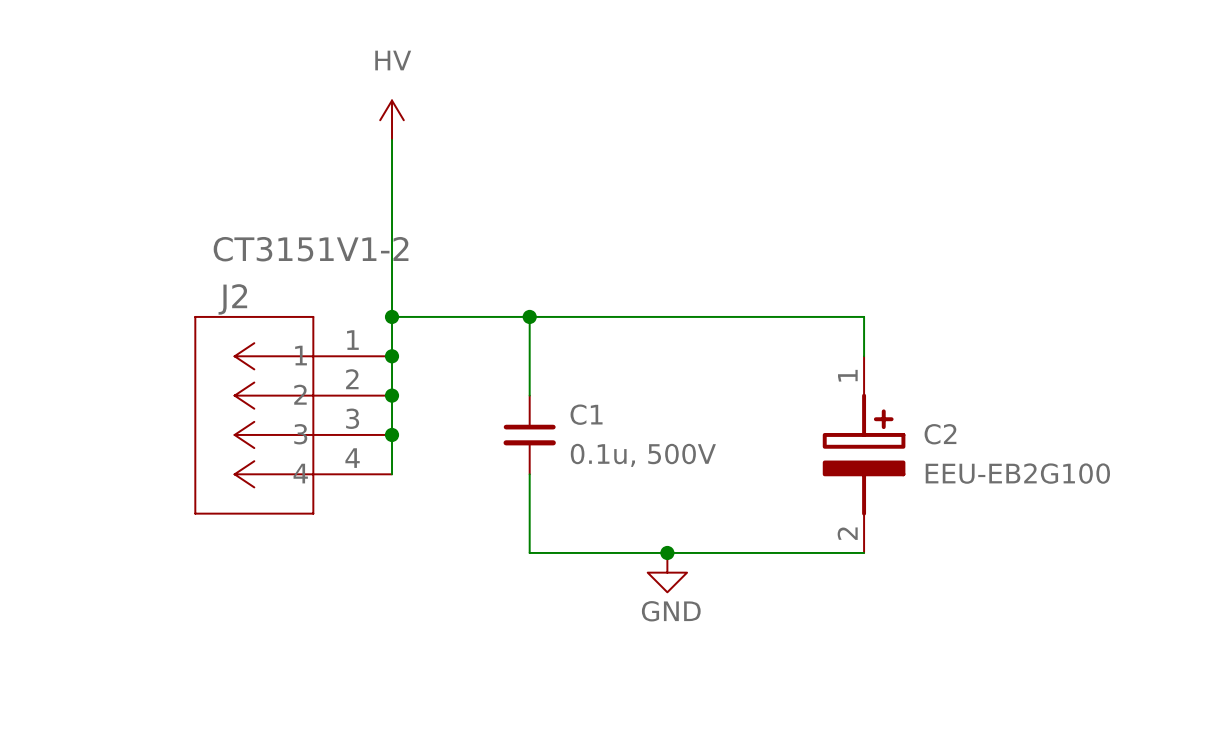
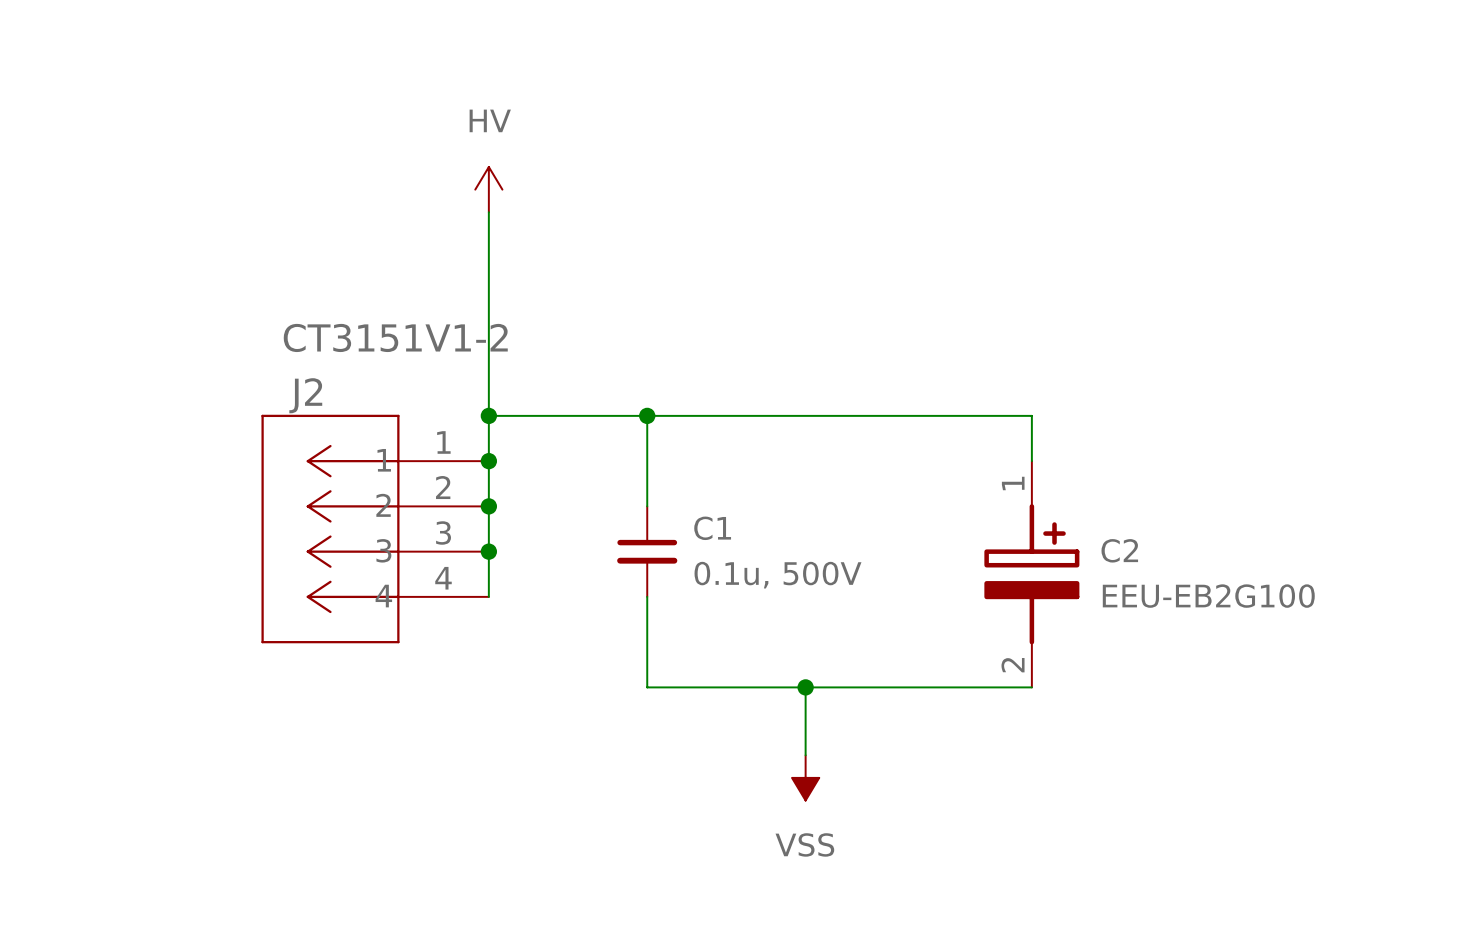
wire: none -> (805, 687) (805, 755)
power symbol: GND (667, 572) -> none
power symbol: none -> VSS (805, 777)

